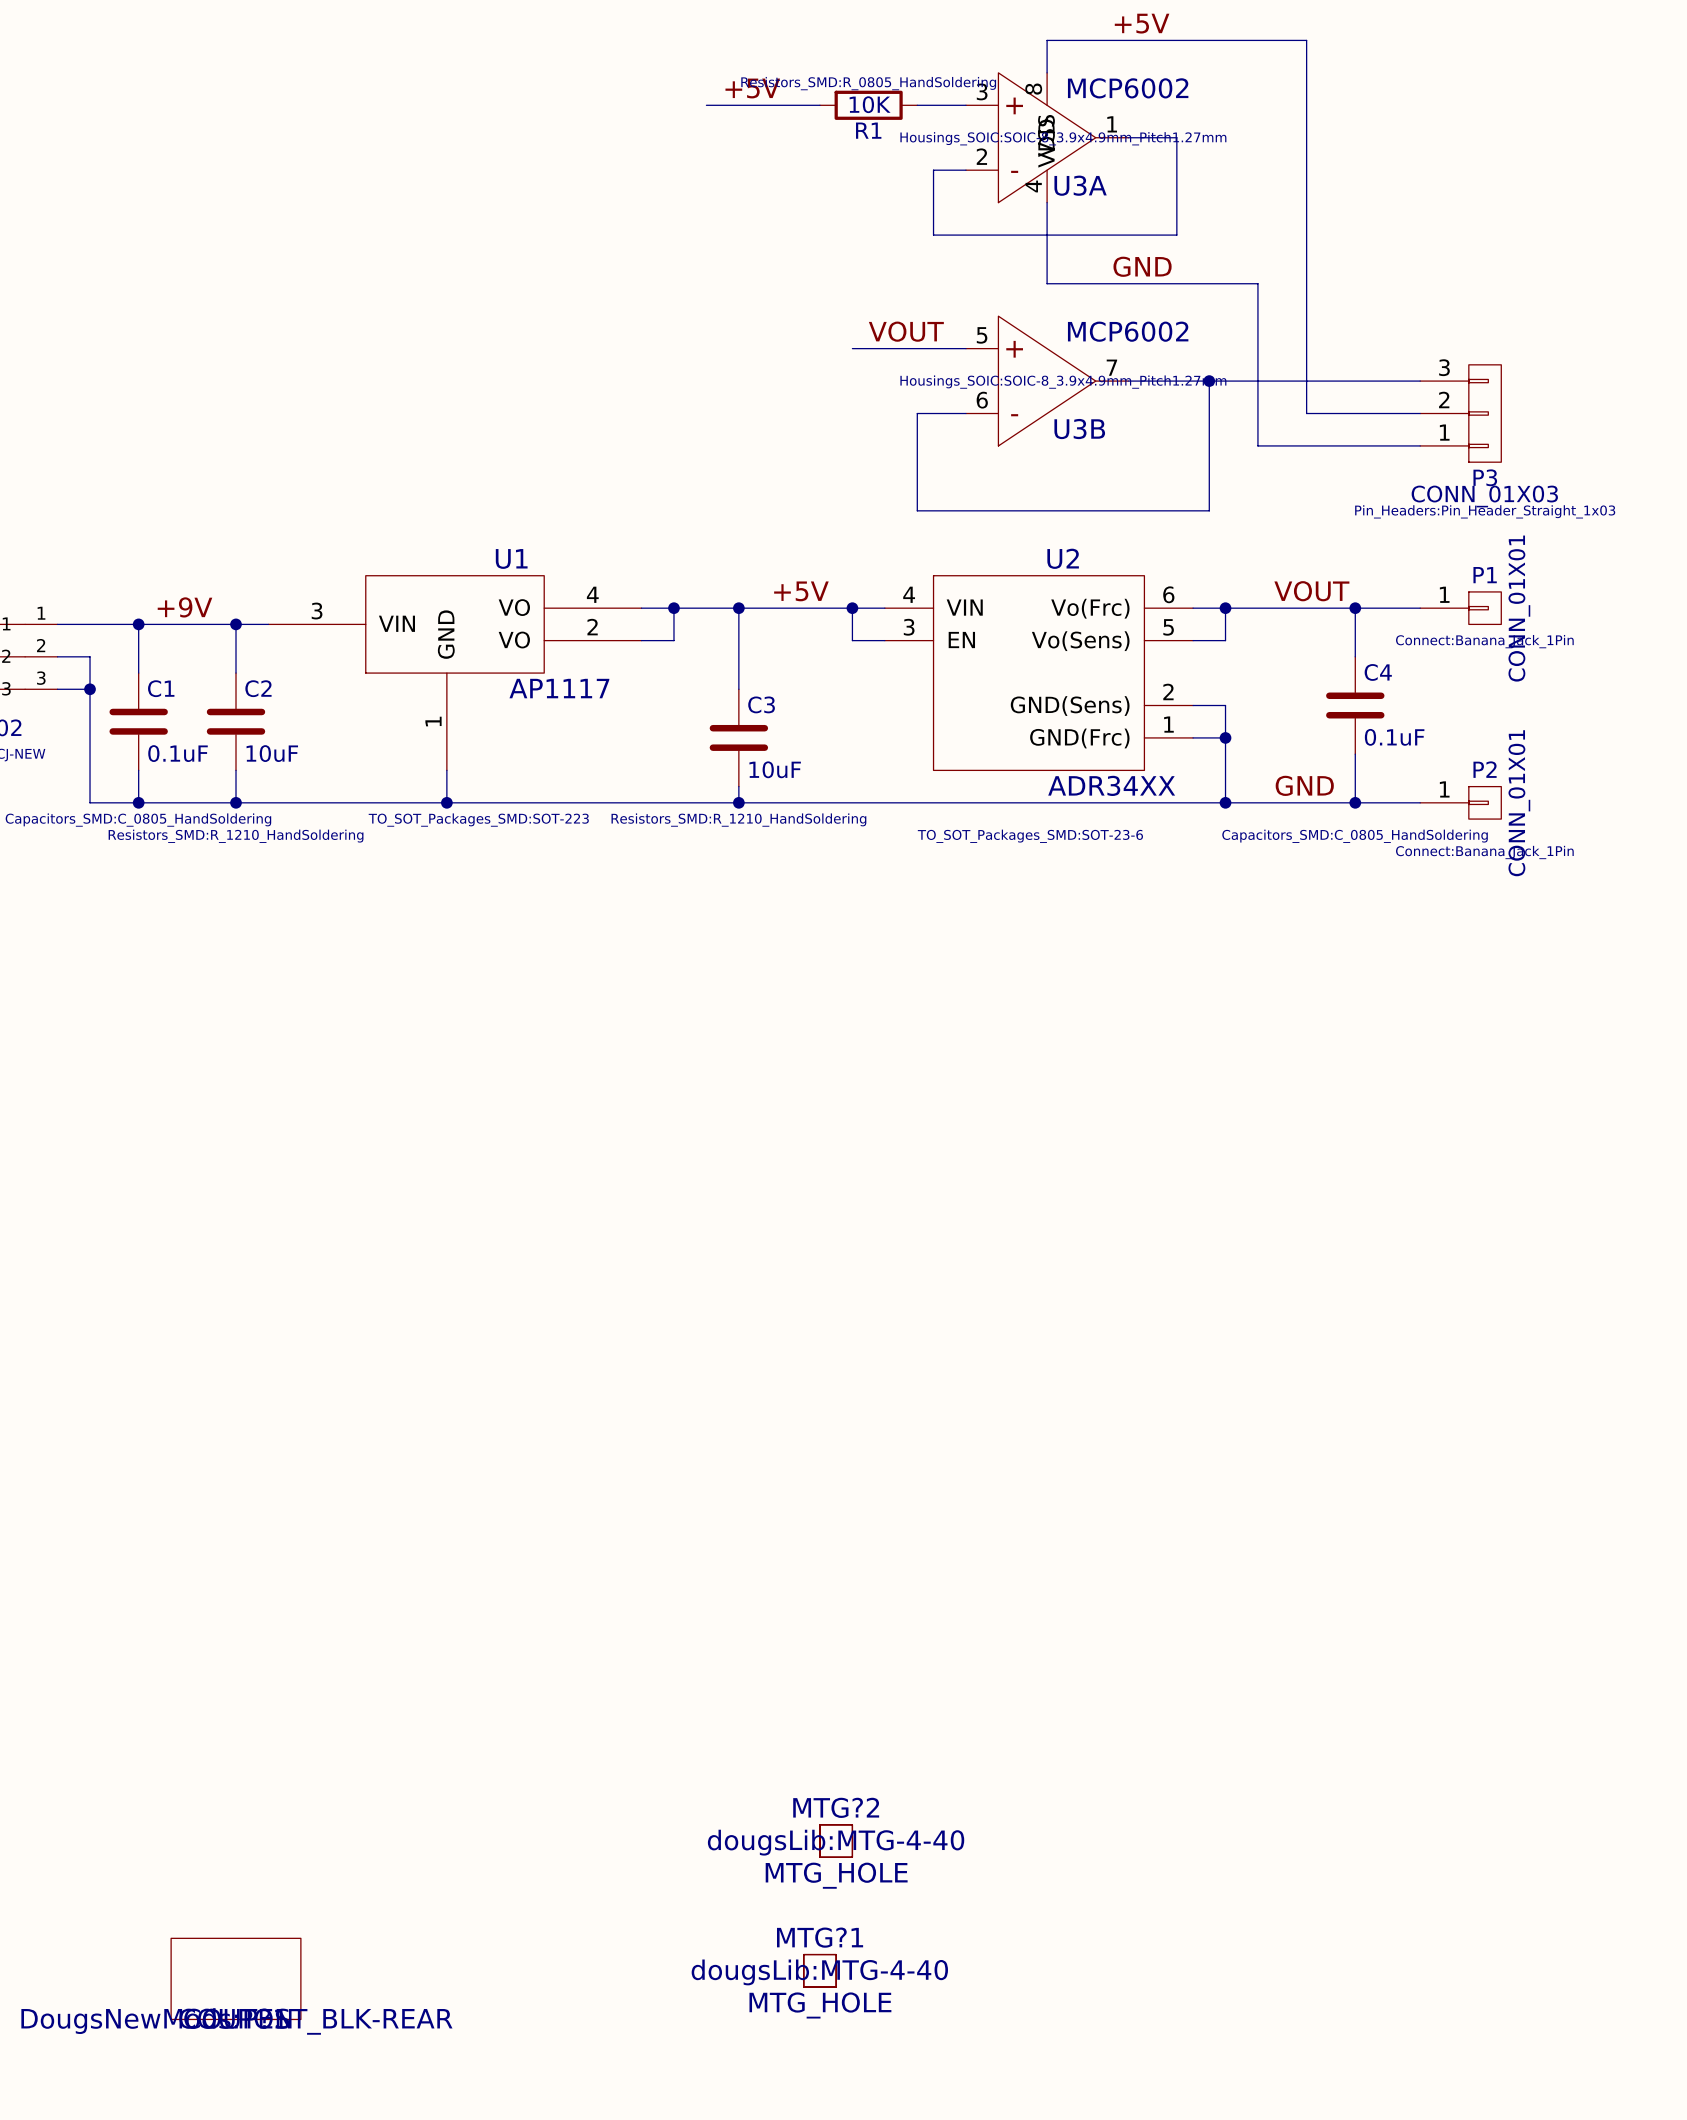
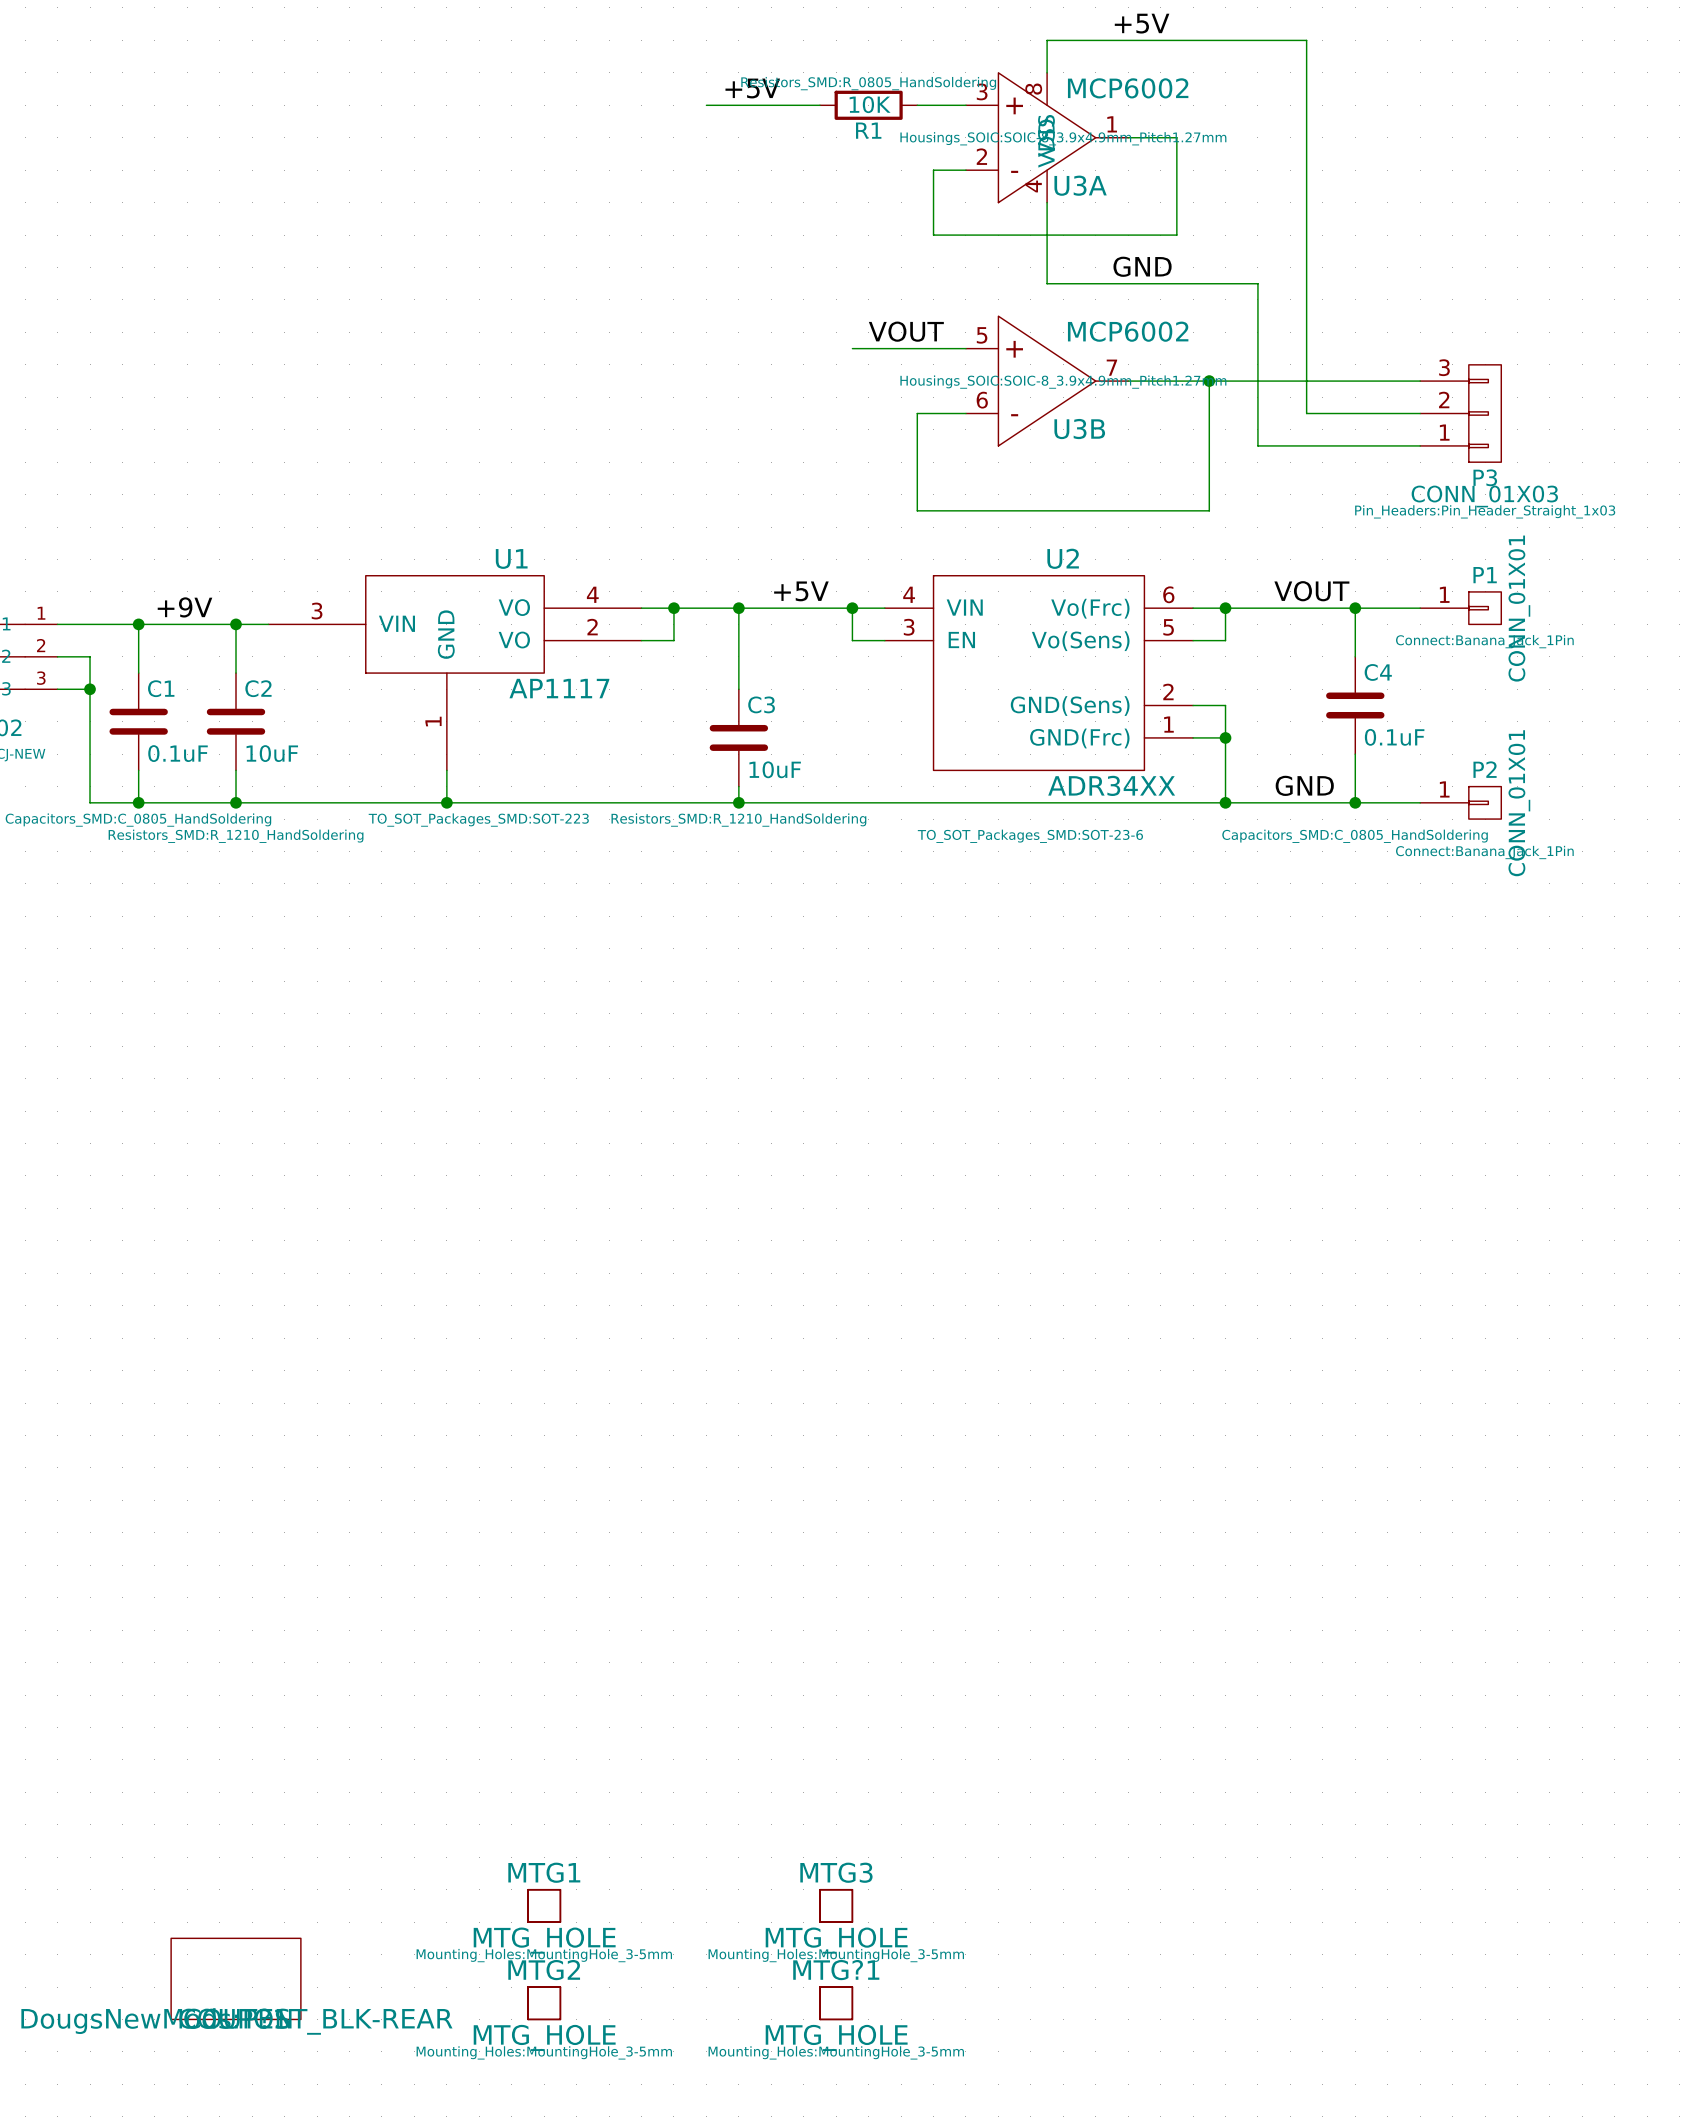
MTG?2: MTG_HOLE (836, 1841) -> none
MTG1: none -> MTG_HOLE (544, 1905)
MTG3: none -> MTG_HOLE (836, 1905)
MTG?1 position: (819, 1970) -> (836, 2003)
MTG?1 text: dougsLib:MTG-4-40 (819, 1972) -> Mounting_Holes:MountingHole_3-5mm (836, 2052)
MTG2: none -> MTG_HOLE (544, 2003)

